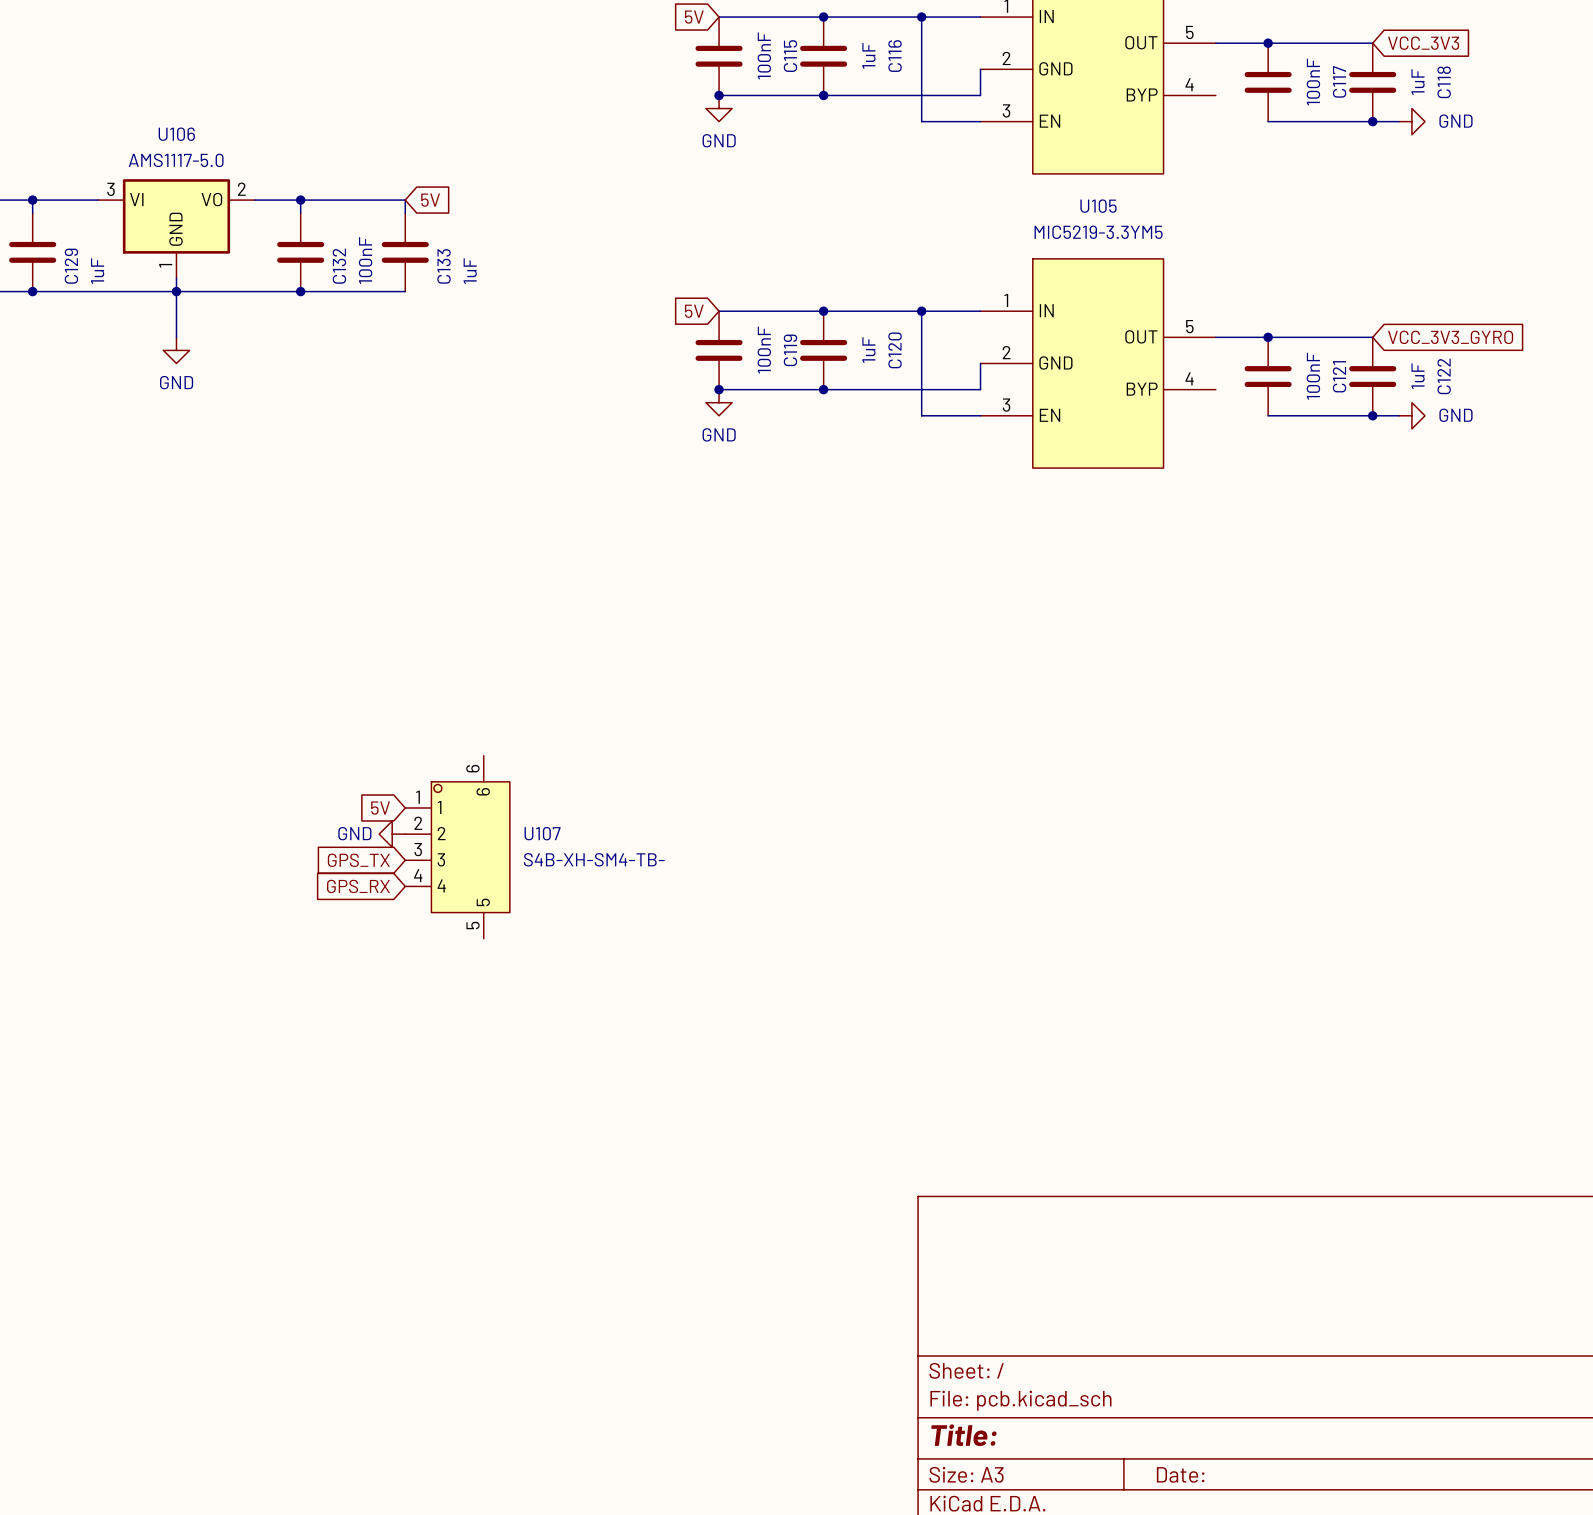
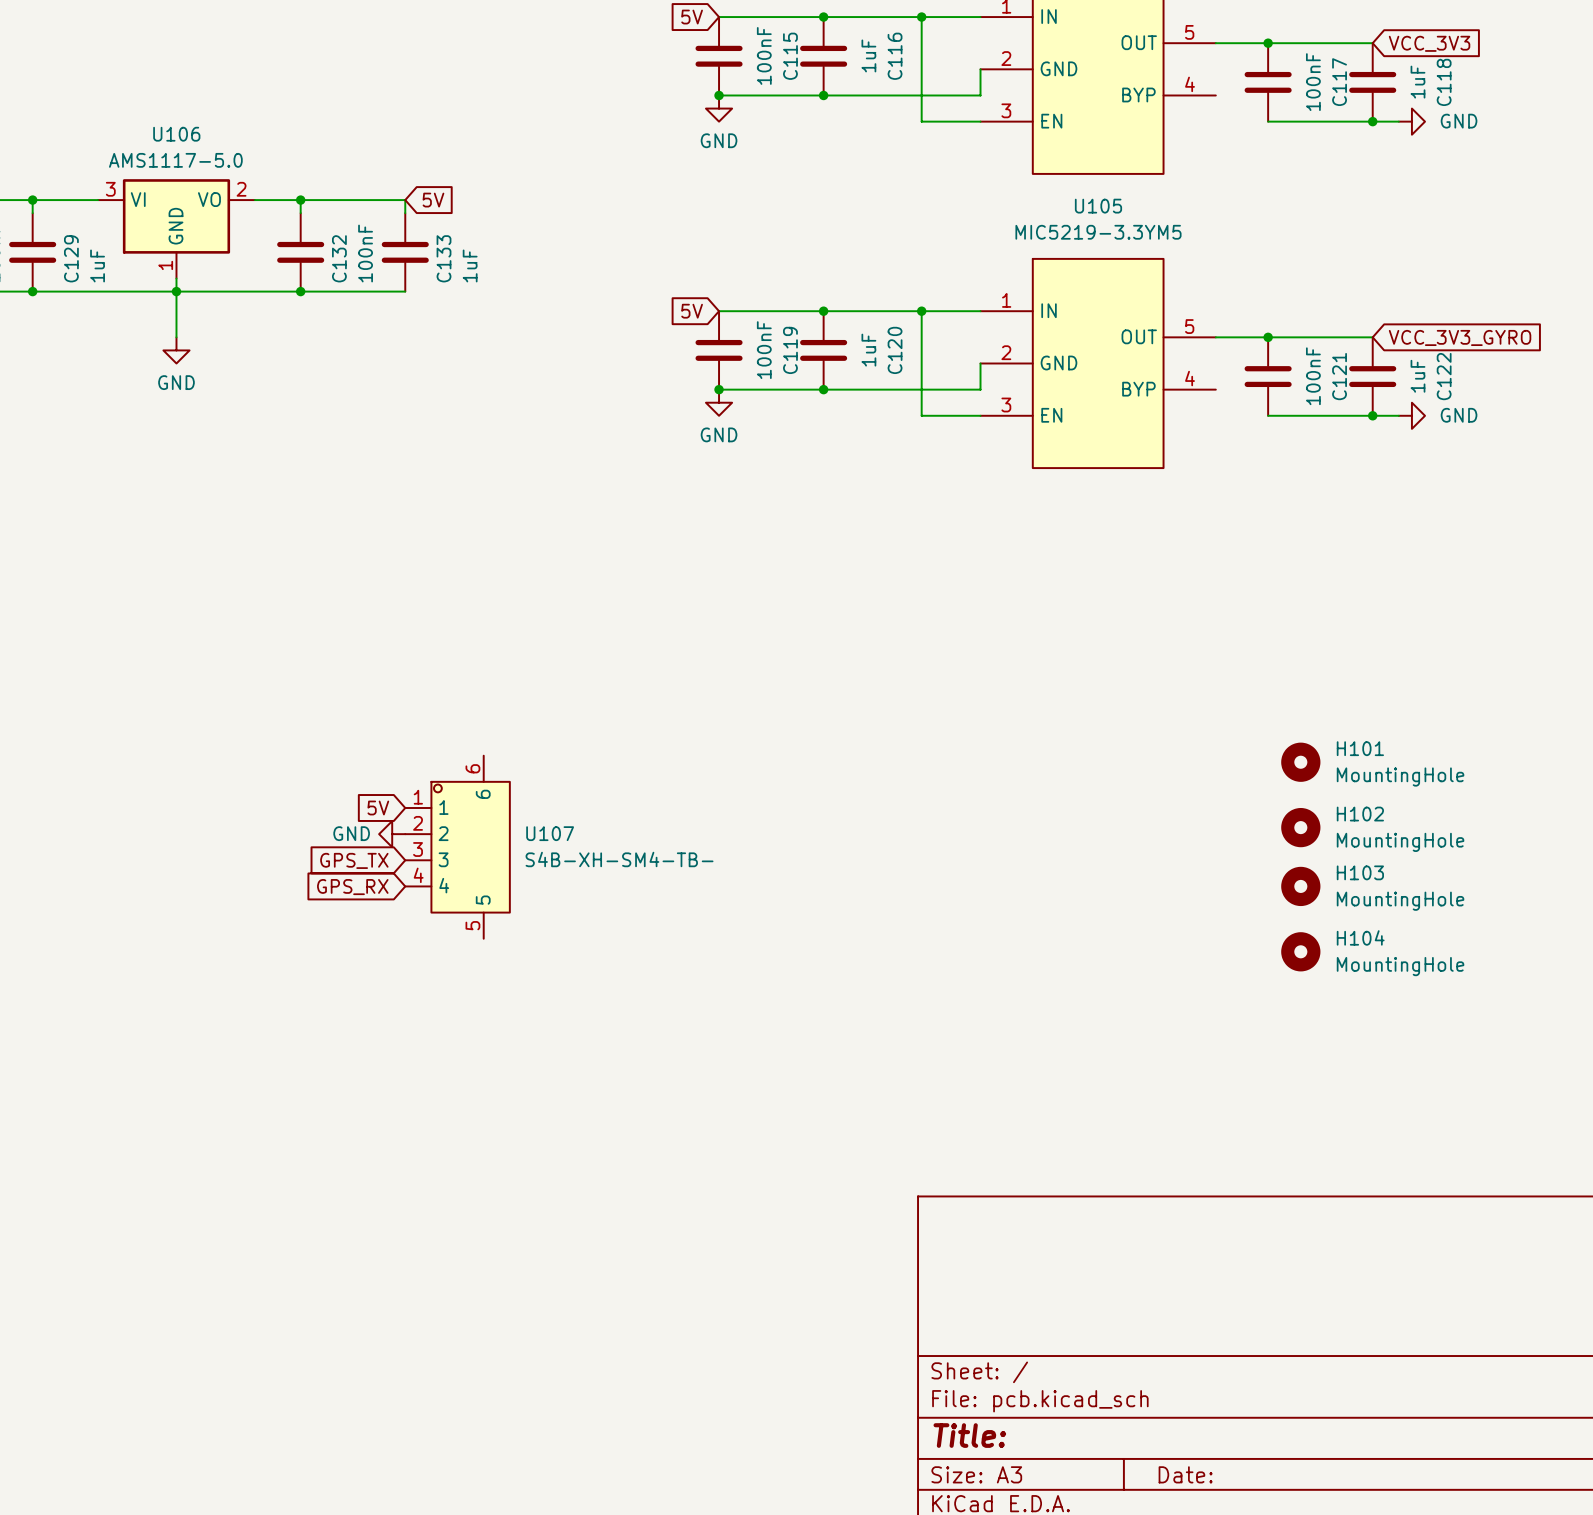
H101: none -> MountingHole (1300, 762)
H102: none -> MountingHole (1300, 827)
H103: none -> MountingHole (1300, 886)
H104: none -> MountingHole (1300, 951)

